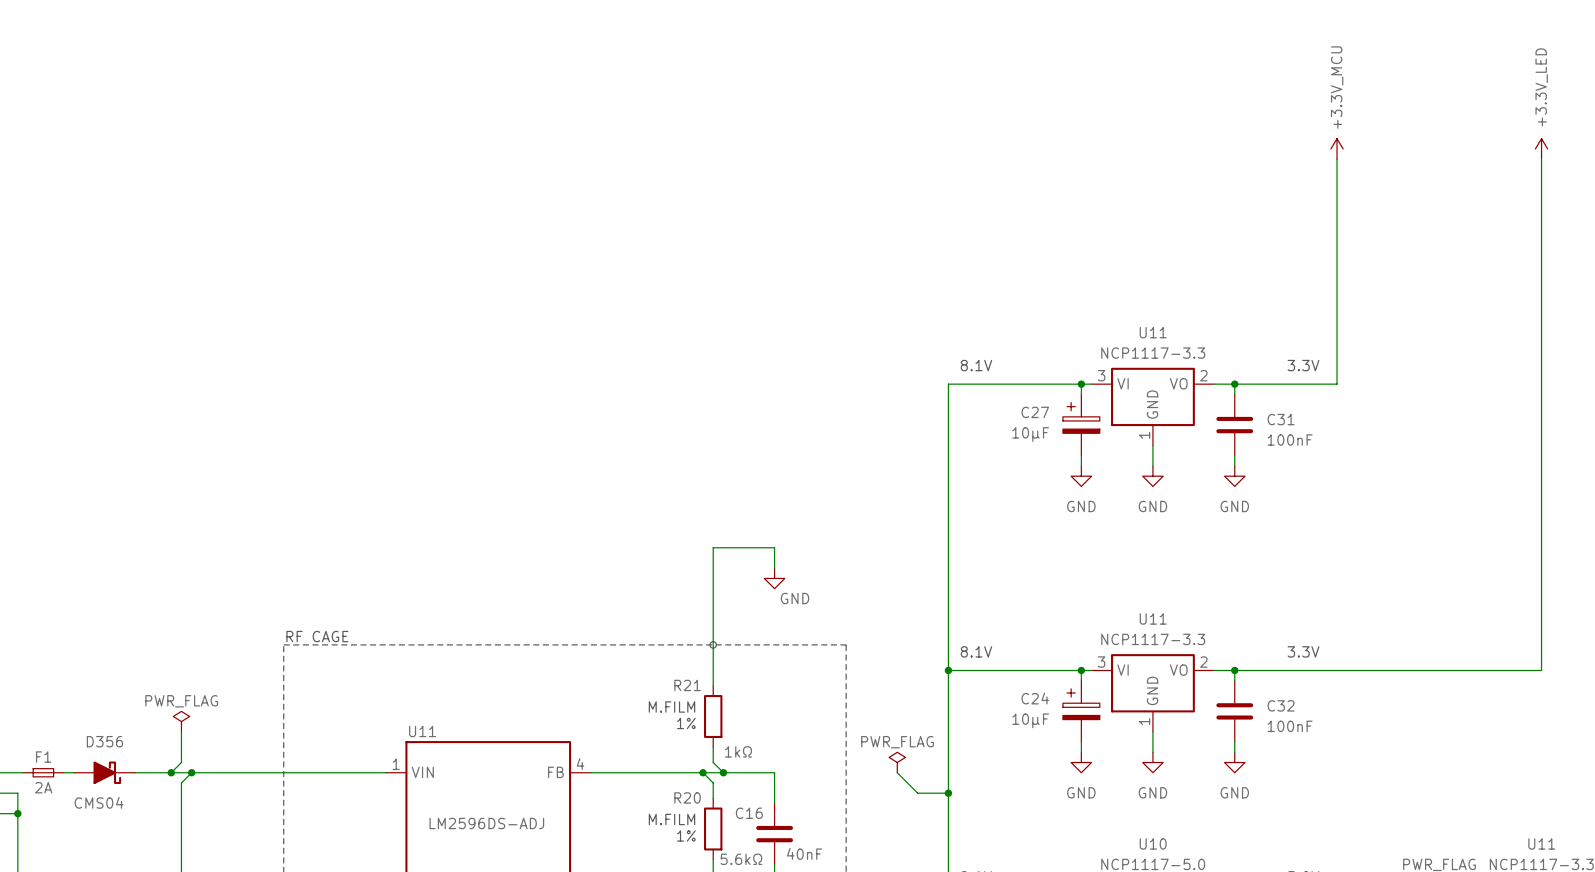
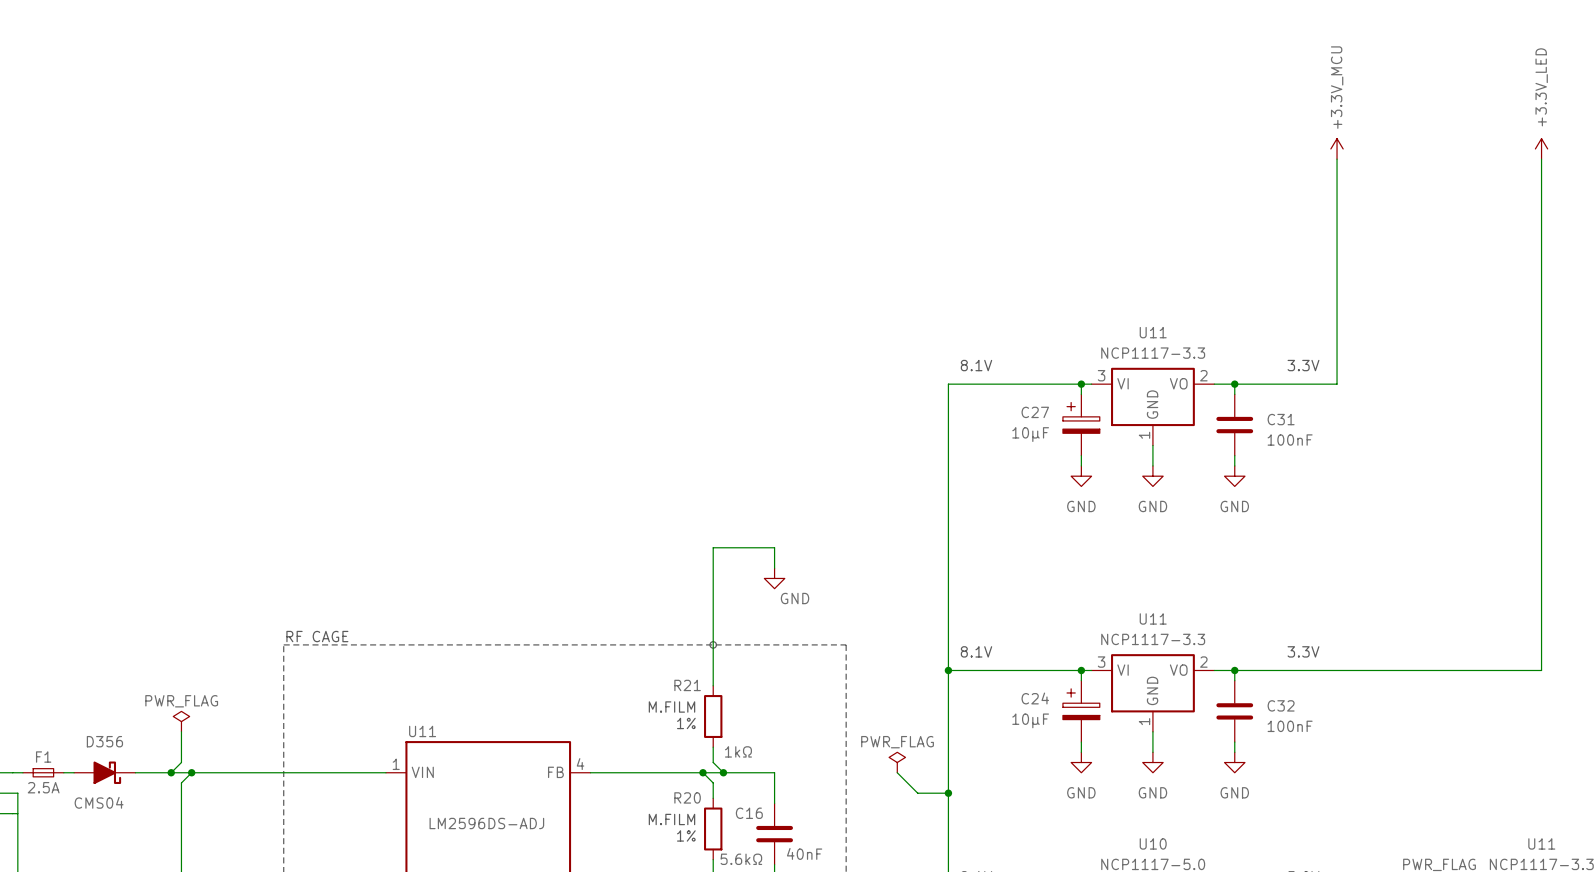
F1 value: 2A (43, 787) -> 2.5A (43, 787)
junction: (17, 813) -> none

